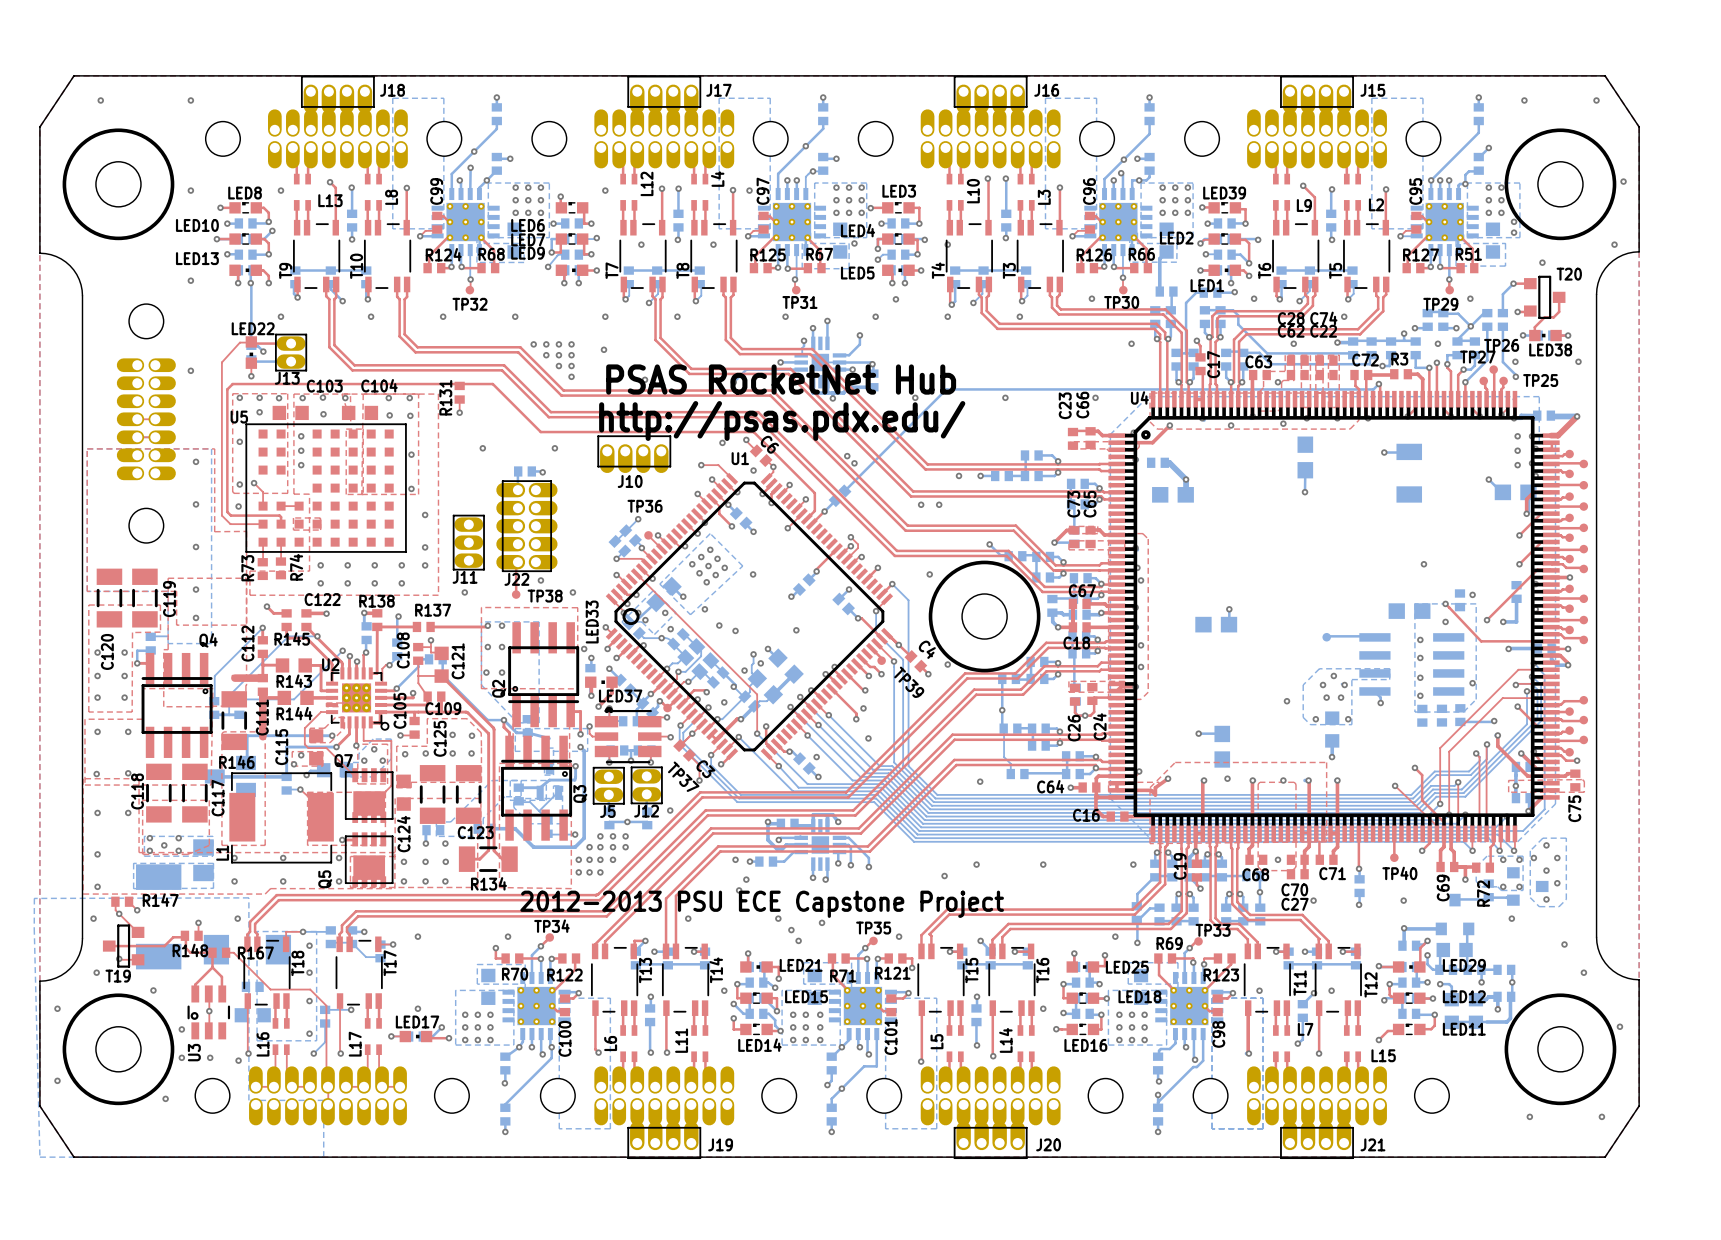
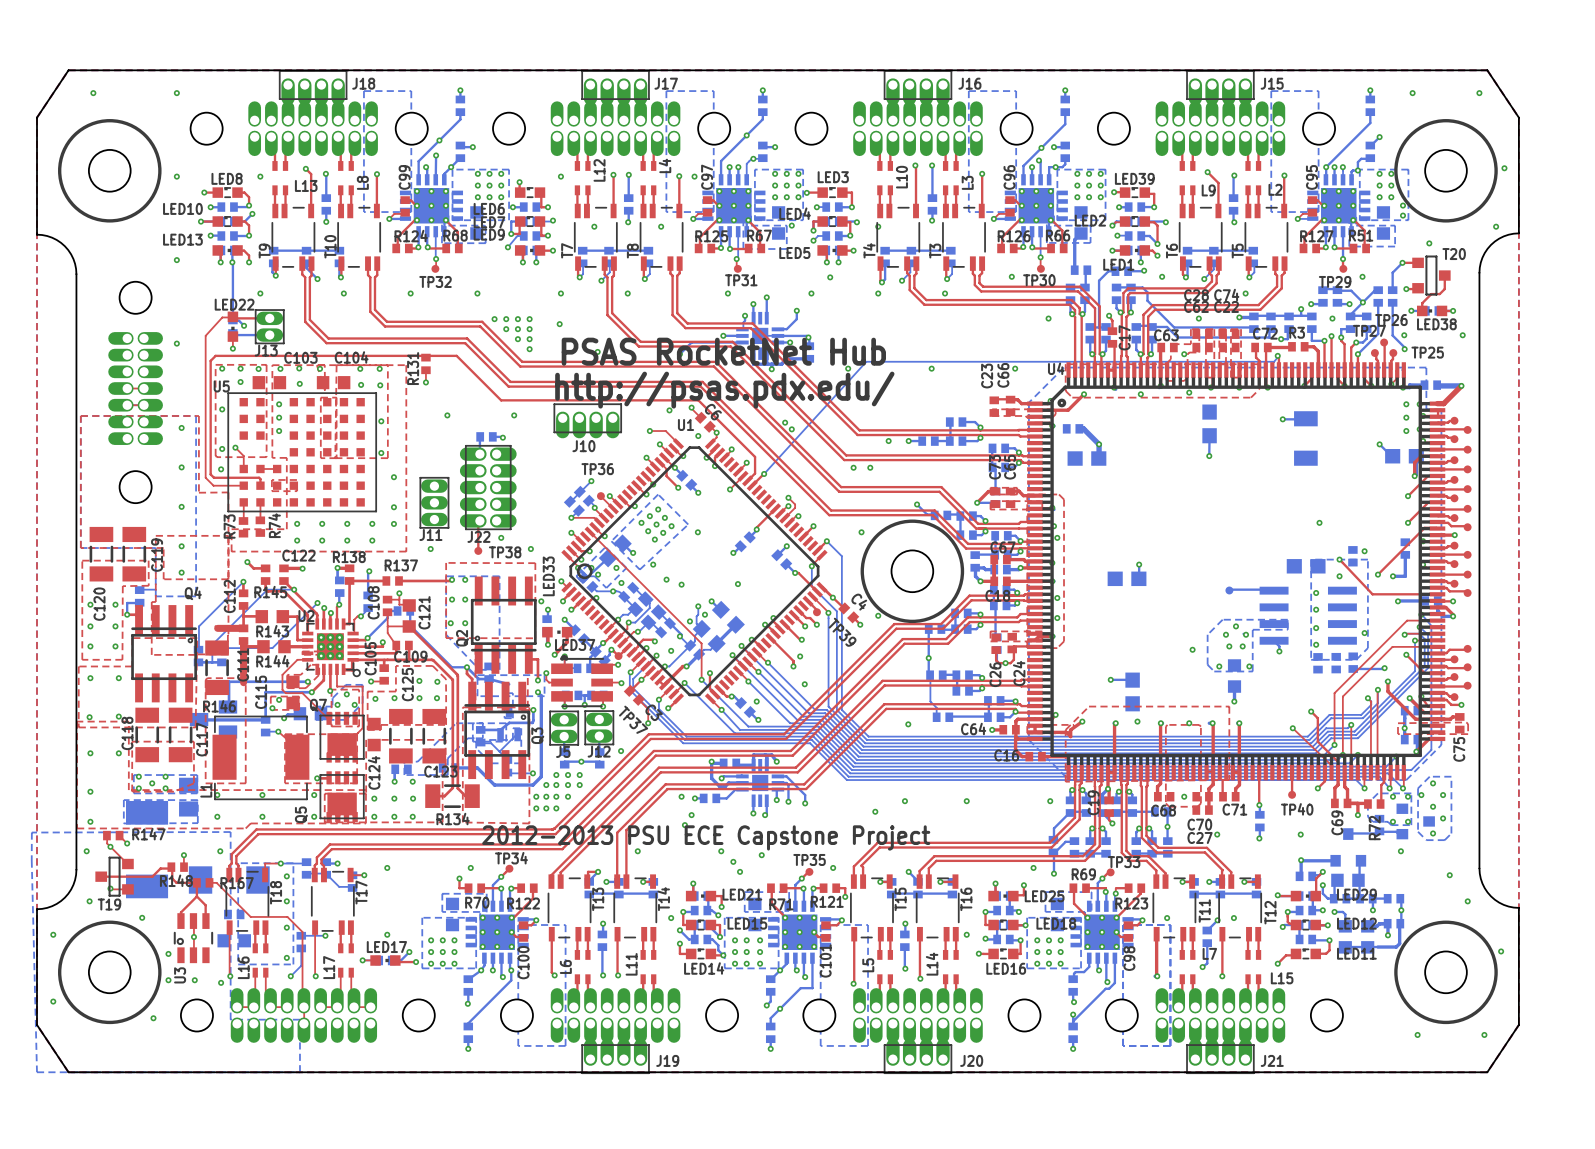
bottom track: (1378, 384) (1373, 389) (946, 389) (844, 490) -> none
part: (840, 495) -> none
bottom track: (835, 500) (824, 511) -> (1278, 355) (1274, 361) (866, 361) (764, 473)

